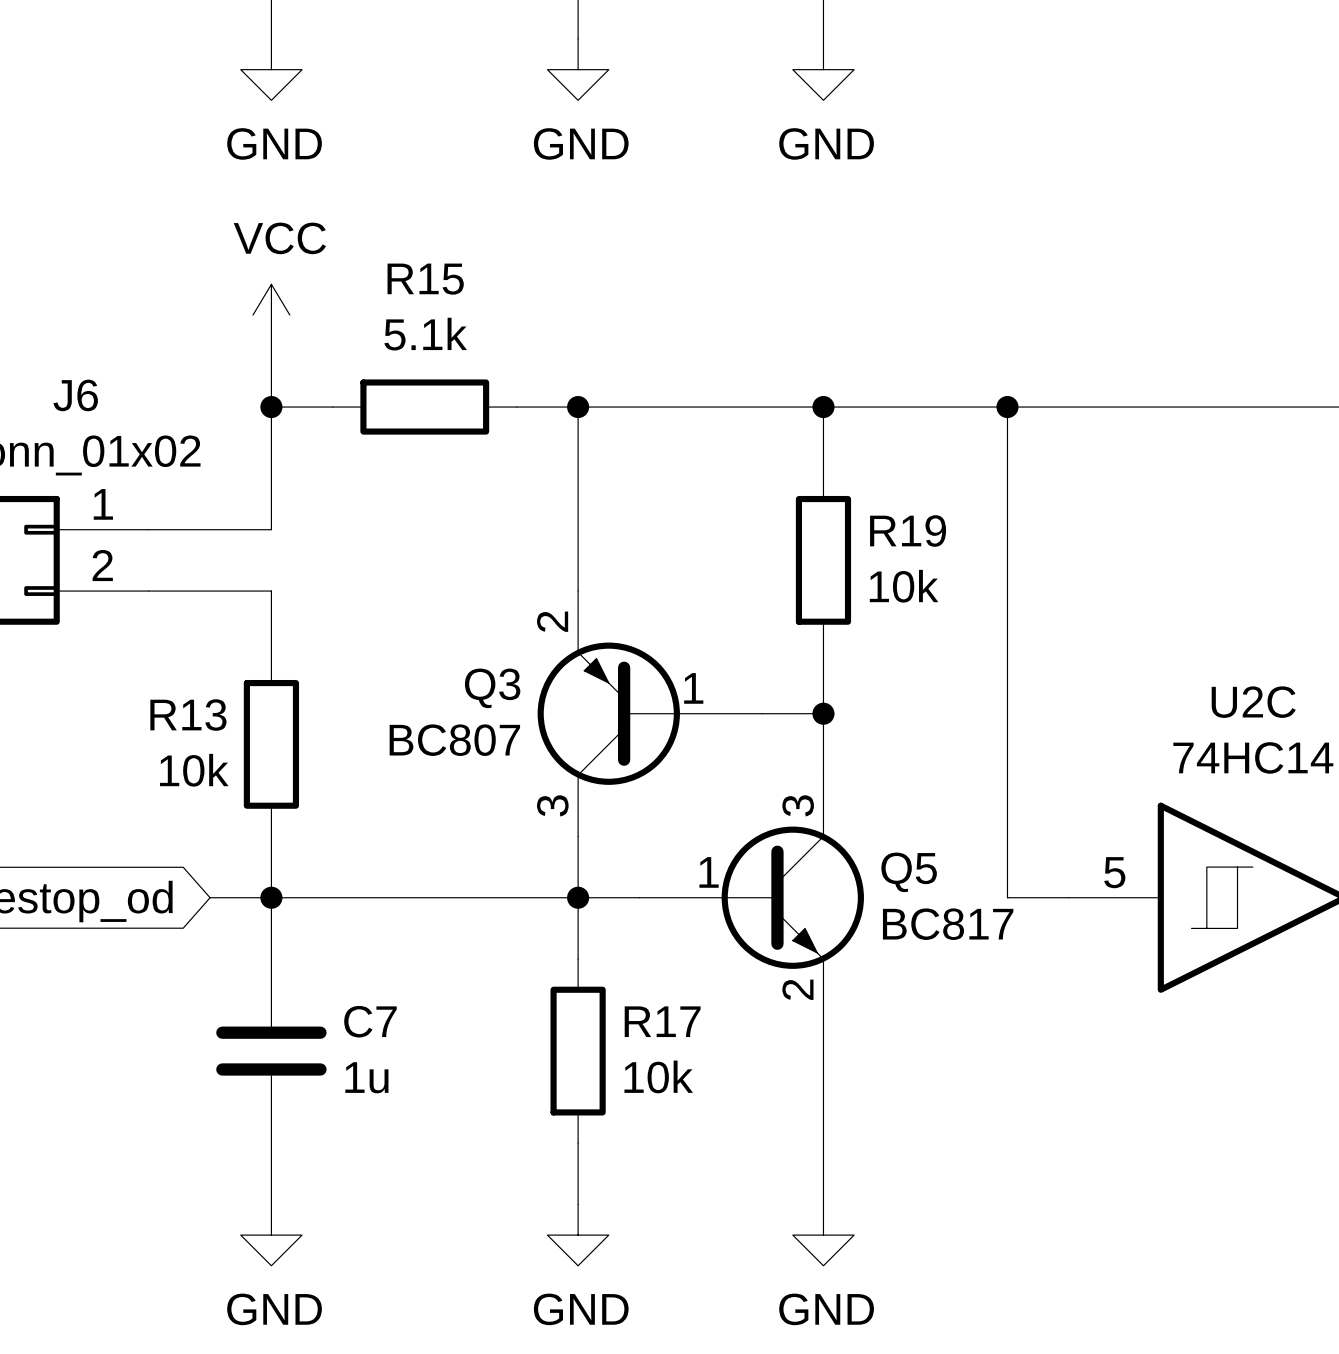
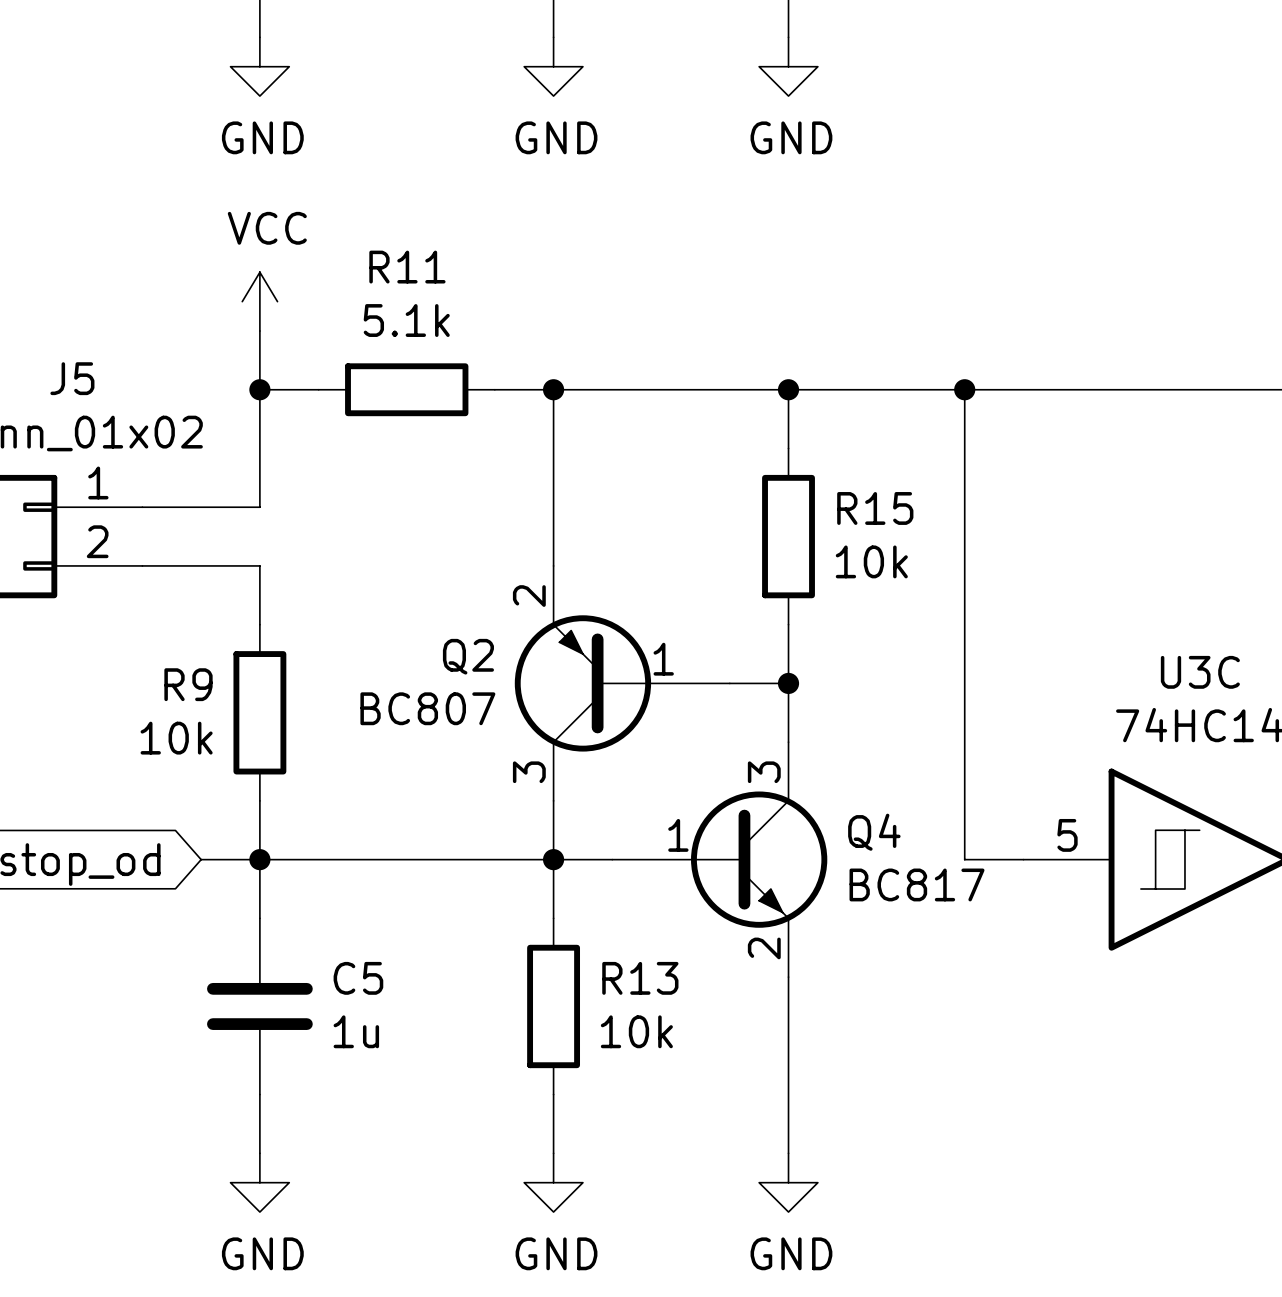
R15 name: R15 (425, 279) -> R11 (407, 267)
J6 name: J6 (75, 395) -> J5 (72, 378)
R19 name: R19 (908, 531) -> R15 (875, 508)
Q3 name: Q3 (492, 688) -> Q2 (468, 656)
U2C name: U2C (1253, 702) -> U3C (1200, 672)
R13 name: R13 (188, 715) -> R9 (188, 684)
Q5 name: Q5 (909, 872) -> Q4 (874, 832)
C7 name: C7 (370, 1021) -> C5 (358, 978)
R17 name: R17 (662, 1021) -> R13 (640, 978)

